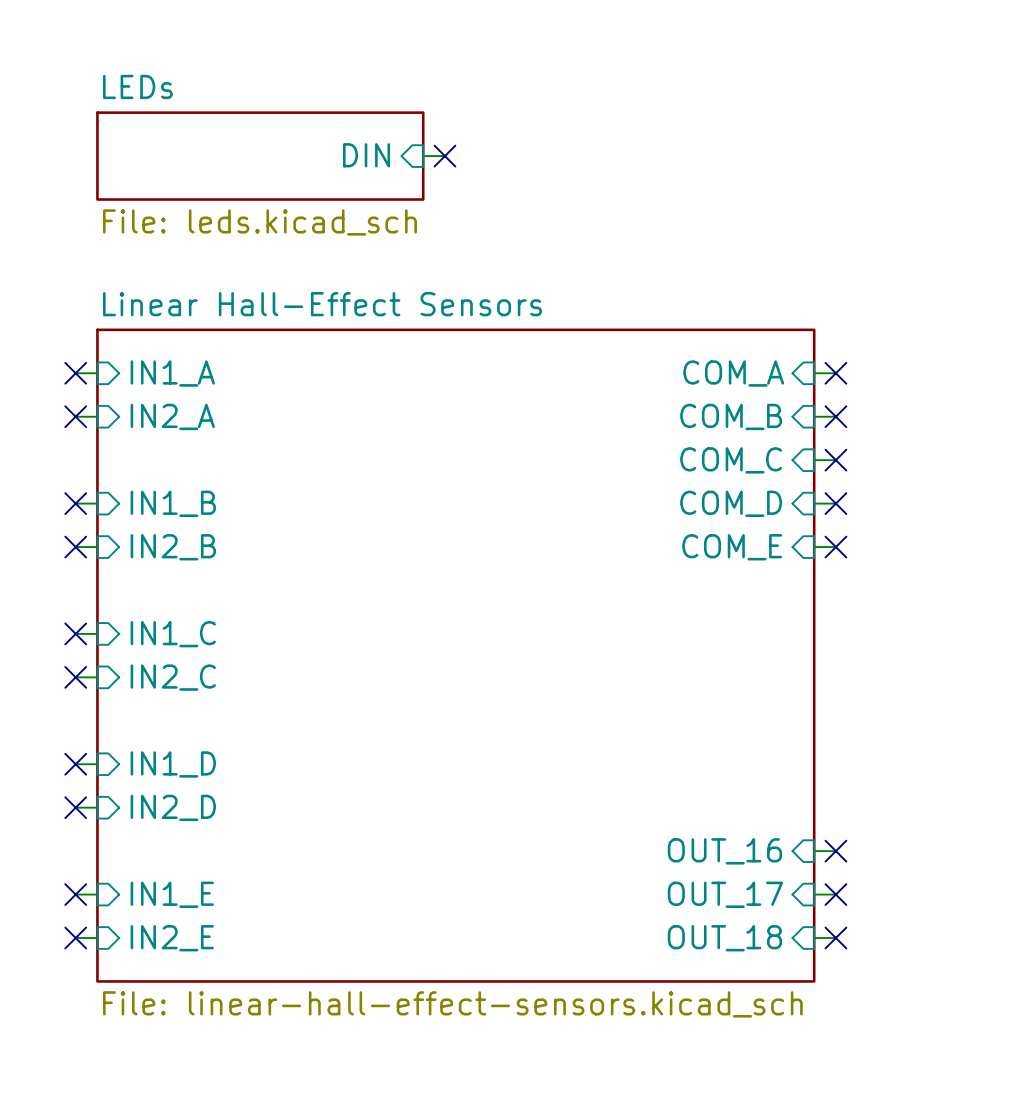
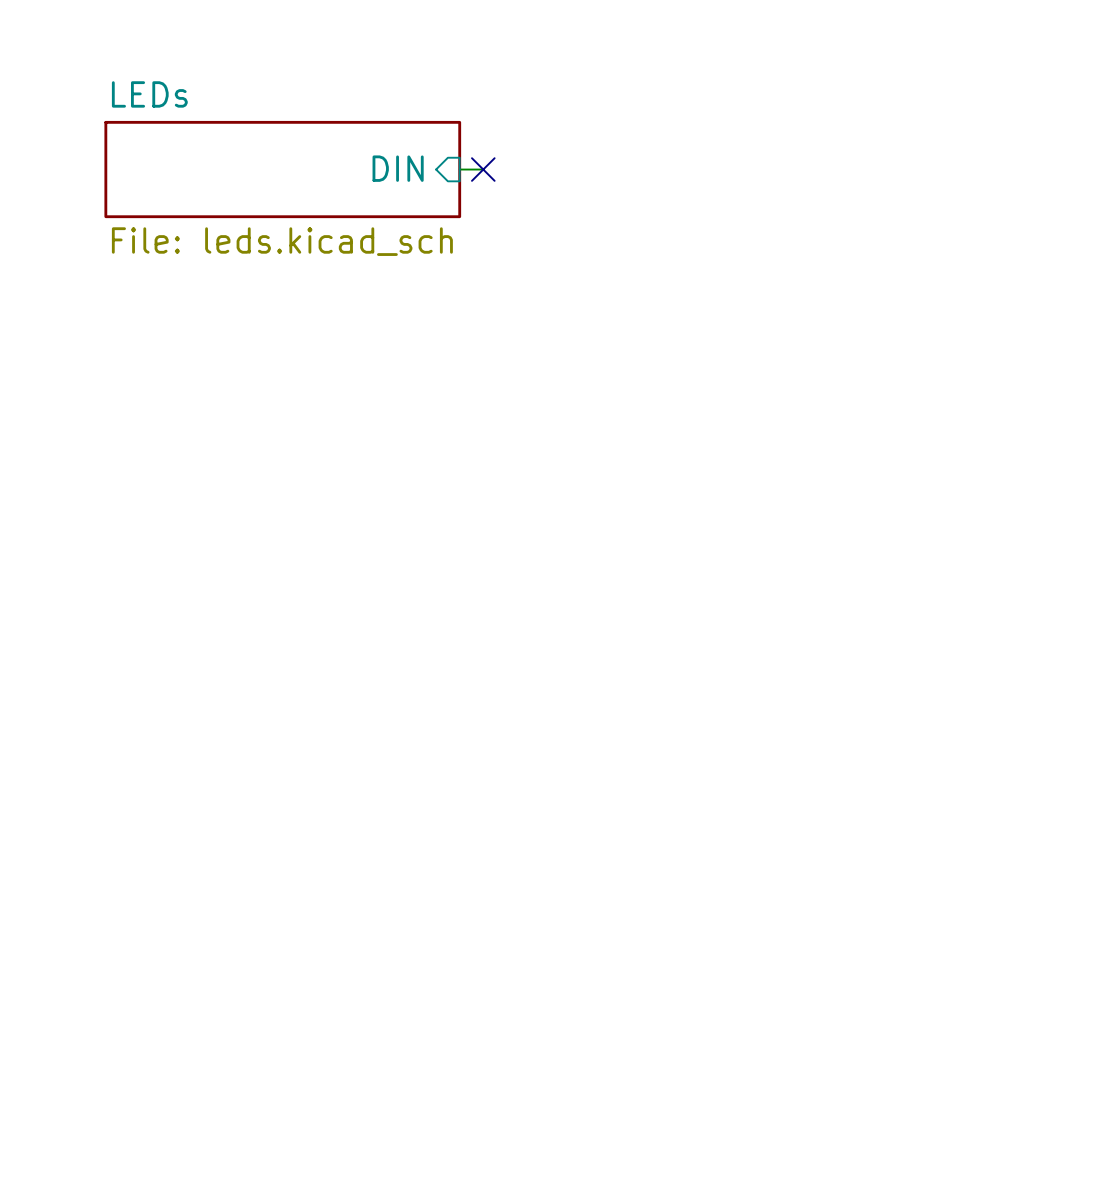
wire: (75, 373) (97, 373) -> none
no-connect mark: (75, 373) -> none
sheet pin: IN1_A (172, 373) -> none
sheet pin: COM_A (733, 373) -> none
wire: (814, 373) (835, 373) -> none
no-connect mark: (835, 373) -> none
wire: (75, 416) (97, 416) -> none
no-connect mark: (75, 416) -> none
sheet pin: IN2_A (172, 416) -> none
sheet pin: COM_B (731, 416) -> none
wire: (814, 416) (835, 416) -> none
no-connect mark: (835, 416) -> none
sheet pin: COM_C (731, 460) -> none
wire: (814, 460) (835, 460) -> none
no-connect mark: (835, 460) -> none
wire: (75, 503) (97, 503) -> none
no-connect mark: (75, 503) -> none
sheet pin: IN1_B (173, 503) -> none
sheet pin: COM_D (731, 503) -> none
wire: (814, 503) (835, 503) -> none
no-connect mark: (835, 503) -> none
wire: (75, 547) (97, 547) -> none
no-connect mark: (75, 547) -> none
sheet pin: IN2_B (173, 547) -> none
sheet pin: COM_E (732, 547) -> none
wire: (814, 547) (835, 547) -> none
no-connect mark: (835, 547) -> none
wire: (75, 633) (97, 633) -> none
no-connect mark: (75, 633) -> none
sheet pin: IN1_C (173, 634) -> none
sheet Linear Hall-Effect Sensors: File: linear-hall-effect-sensors.kicad_sch (455, 655) -> none
wire: (75, 677) (97, 677) -> none
no-connect mark: (75, 677) -> none
sheet pin: IN2_C (173, 677) -> none
wire: (75, 764) (97, 764) -> none
no-connect mark: (75, 764) -> none
sheet pin: IN1_D (173, 764) -> none
wire: (75, 807) (97, 807) -> none
no-connect mark: (75, 807) -> none
sheet pin: IN2_D (173, 807) -> none
sheet pin: OUT_16 (724, 851) -> none
wire: (814, 851) (835, 851) -> none
no-connect mark: (835, 851) -> none
wire: (75, 894) (97, 894) -> none
no-connect mark: (75, 894) -> none
sheet pin: IN1_E (172, 894) -> none
sheet pin: OUT_17 (725, 894) -> none
wire: (814, 894) (835, 894) -> none
no-connect mark: (835, 894) -> none
wire: (75, 938) (97, 938) -> none
no-connect mark: (75, 938) -> none
sheet pin: IN2_E (172, 938) -> none
sheet pin: OUT_18 (724, 938) -> none
wire: (814, 938) (835, 938) -> none
no-connect mark: (835, 938) -> none

